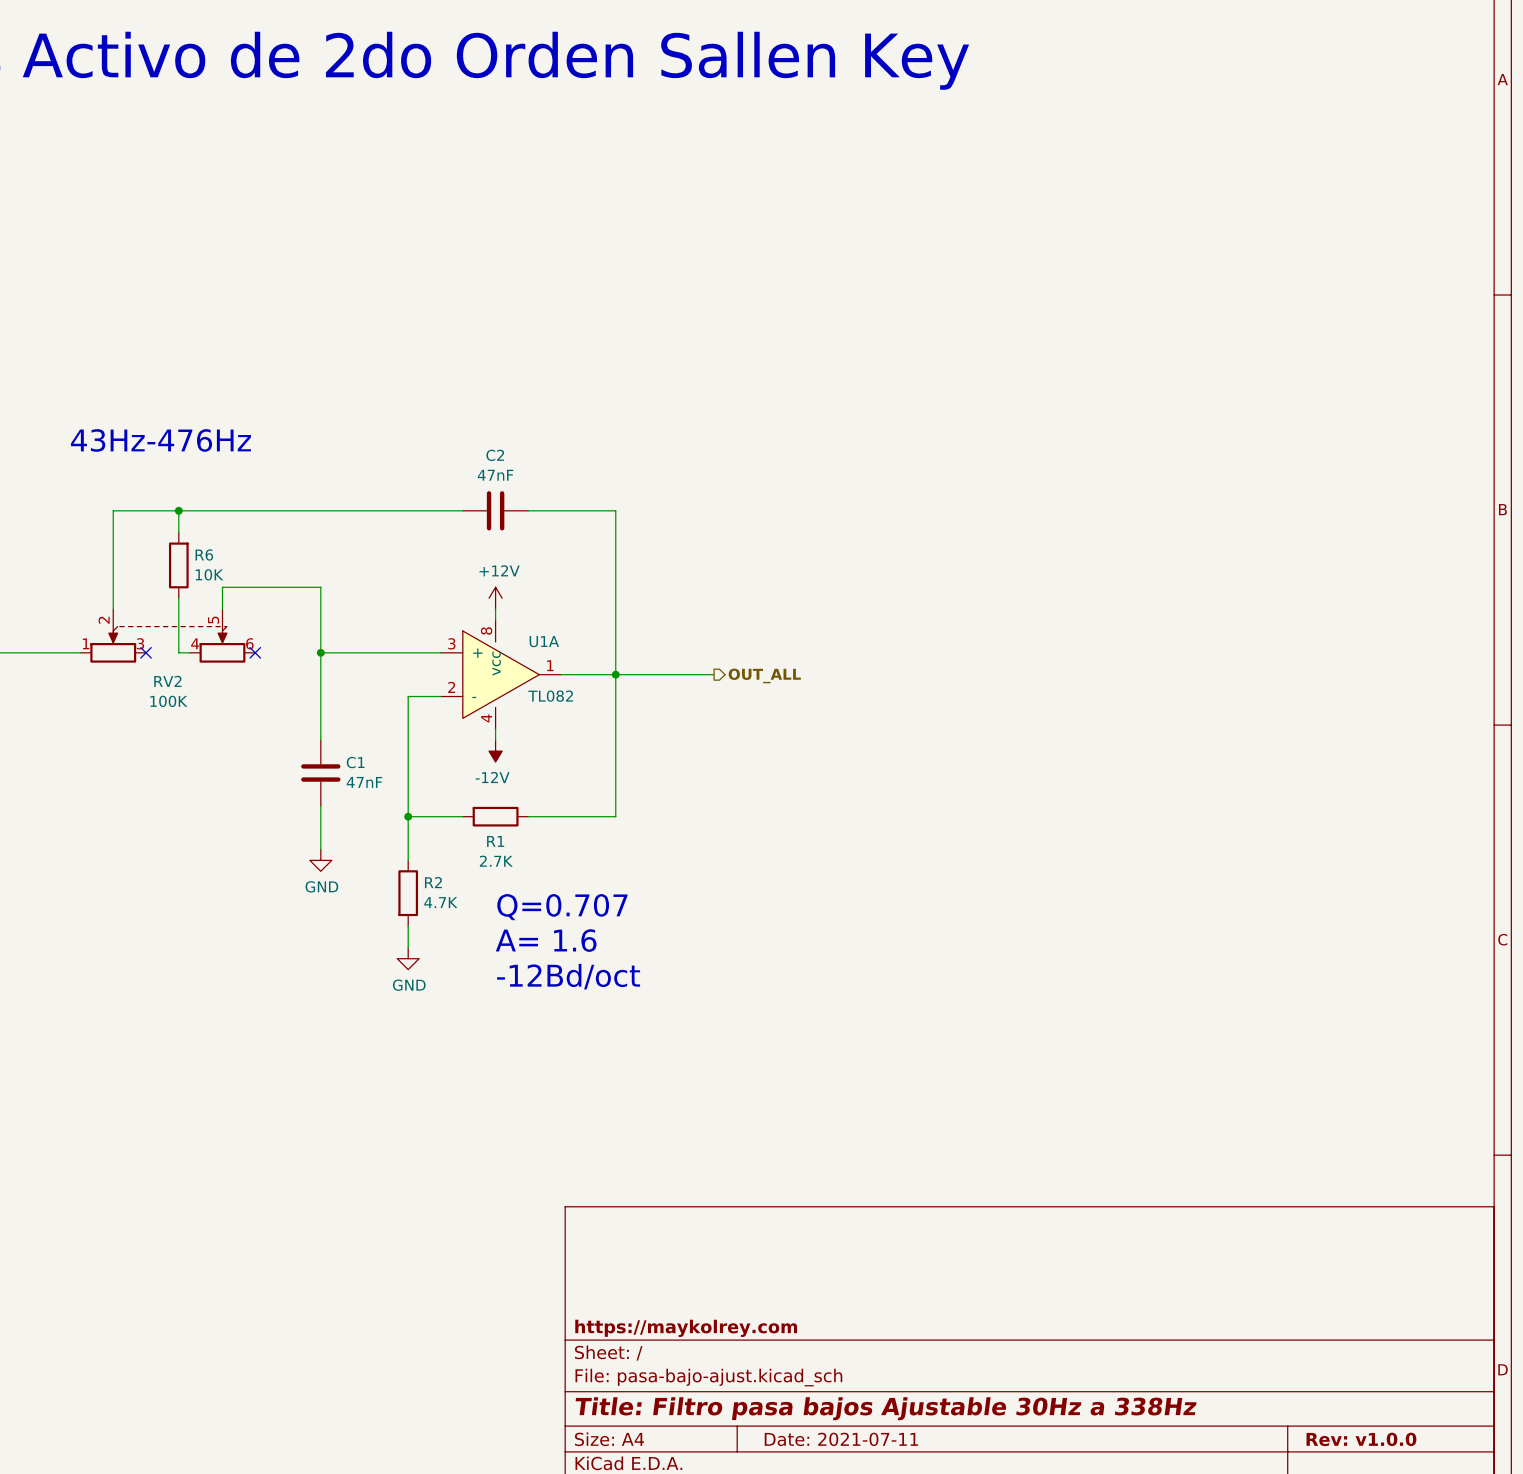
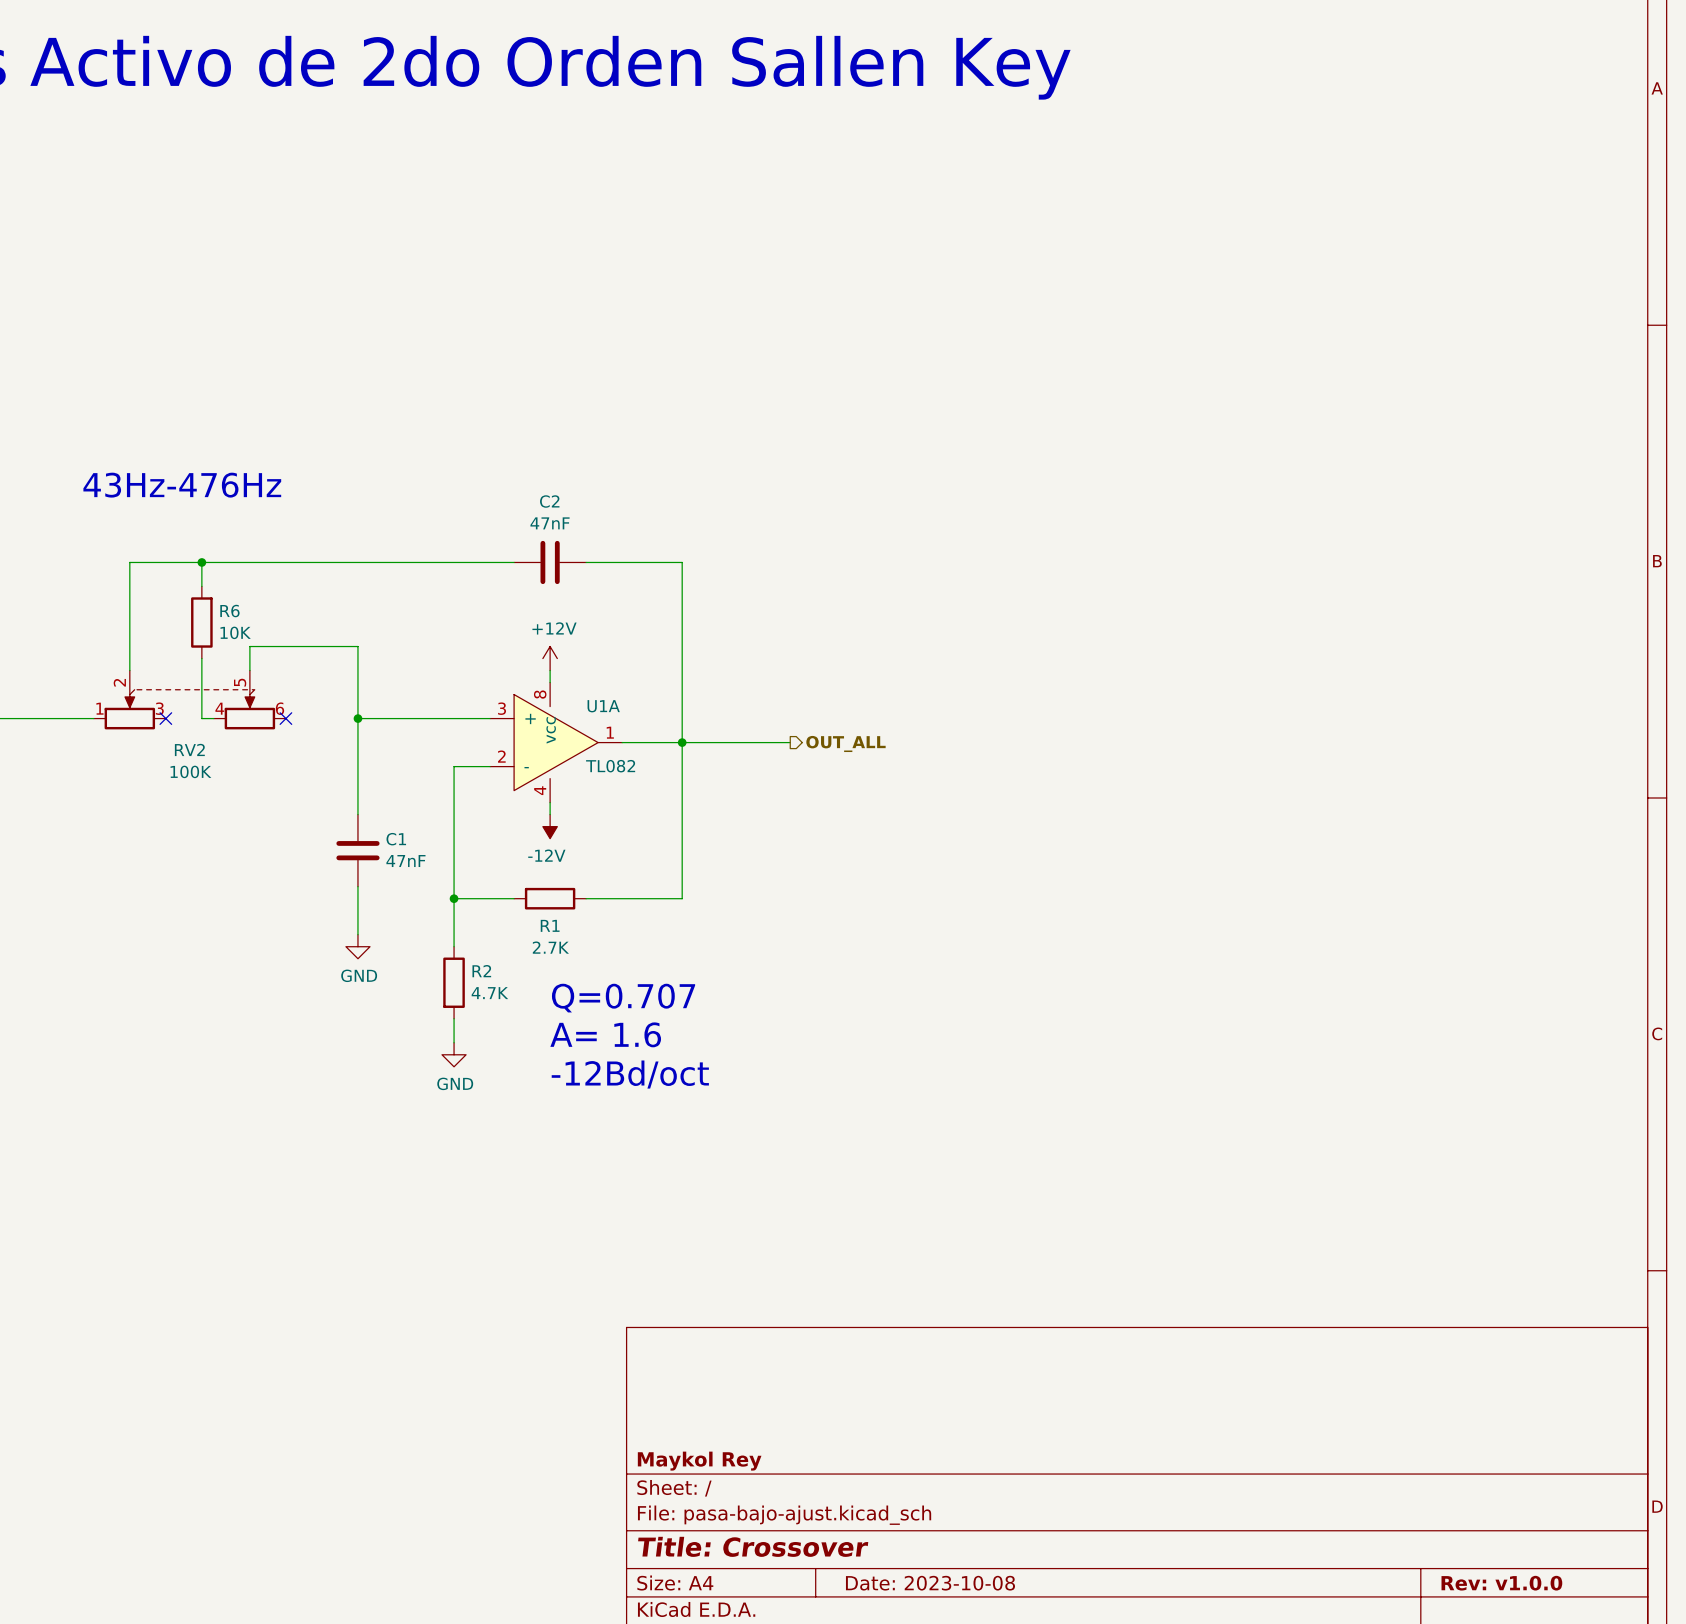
title block: https://maykolrey.com (686, 1328) -> Maykol Rey (699, 1461)
title block: Title: Filtro pasa bajos Ajustable 30Hz a 338Hz (886, 1408) -> Title: Crossover (753, 1546)
title block: Date: 2021-07-11 (841, 1439) -> Date: 2023-10-08 (930, 1583)

